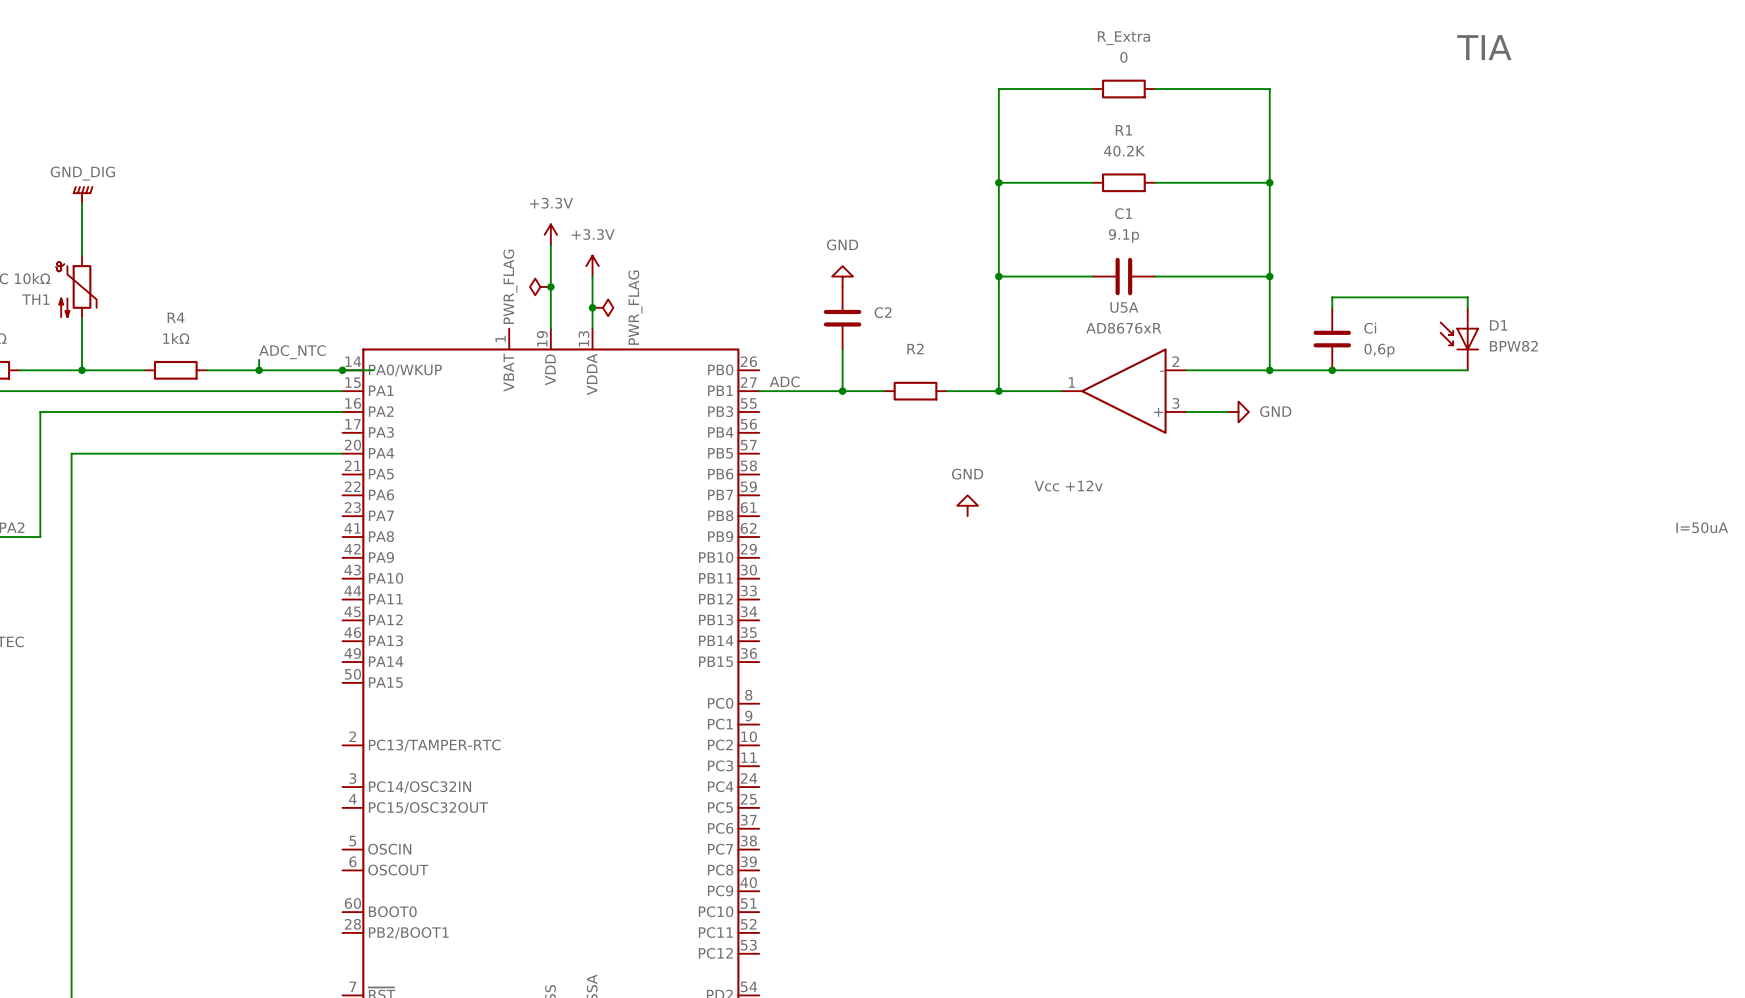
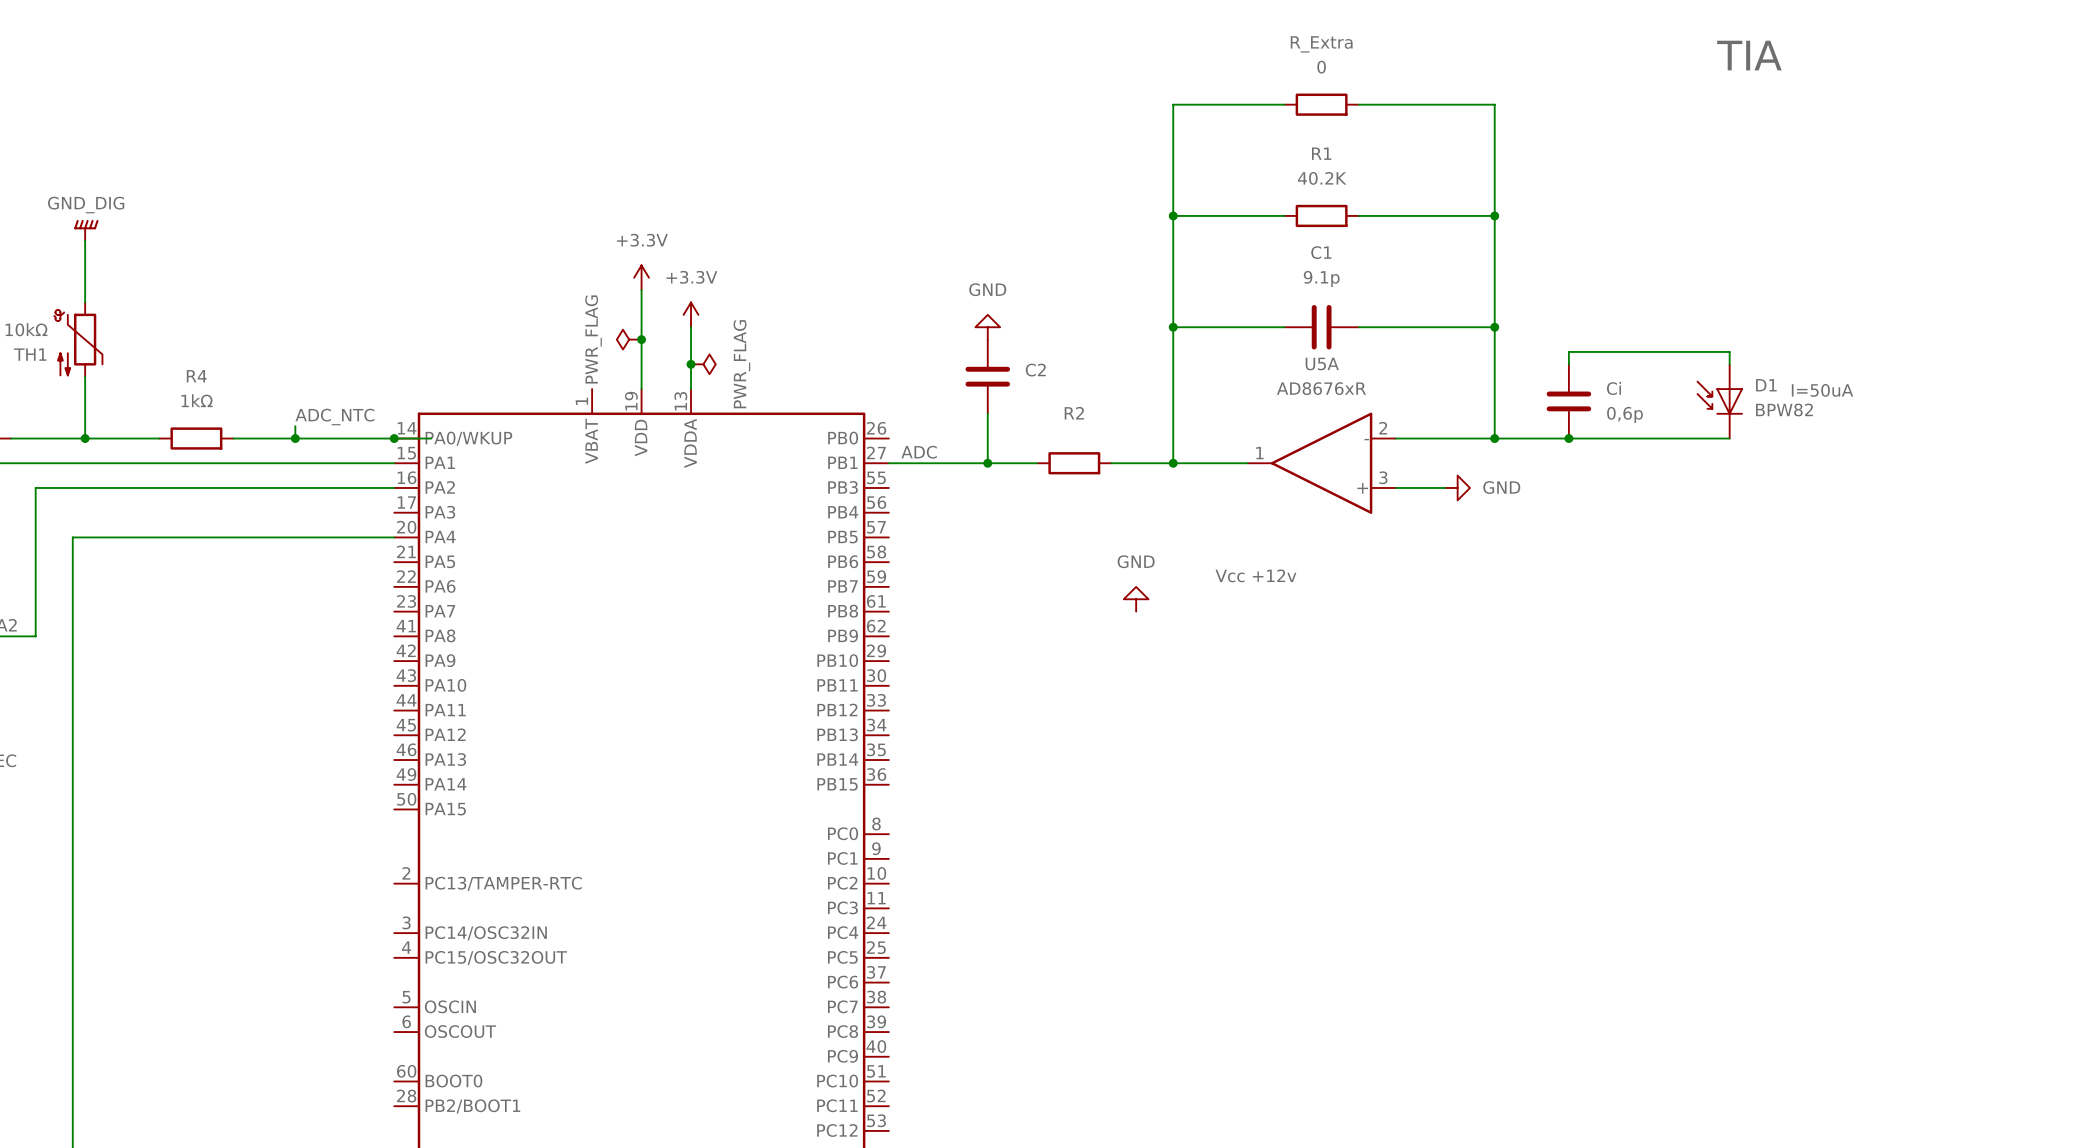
label: none -> I=50uA (1822, 390)
label: I=50uA (1702, 527) -> none

